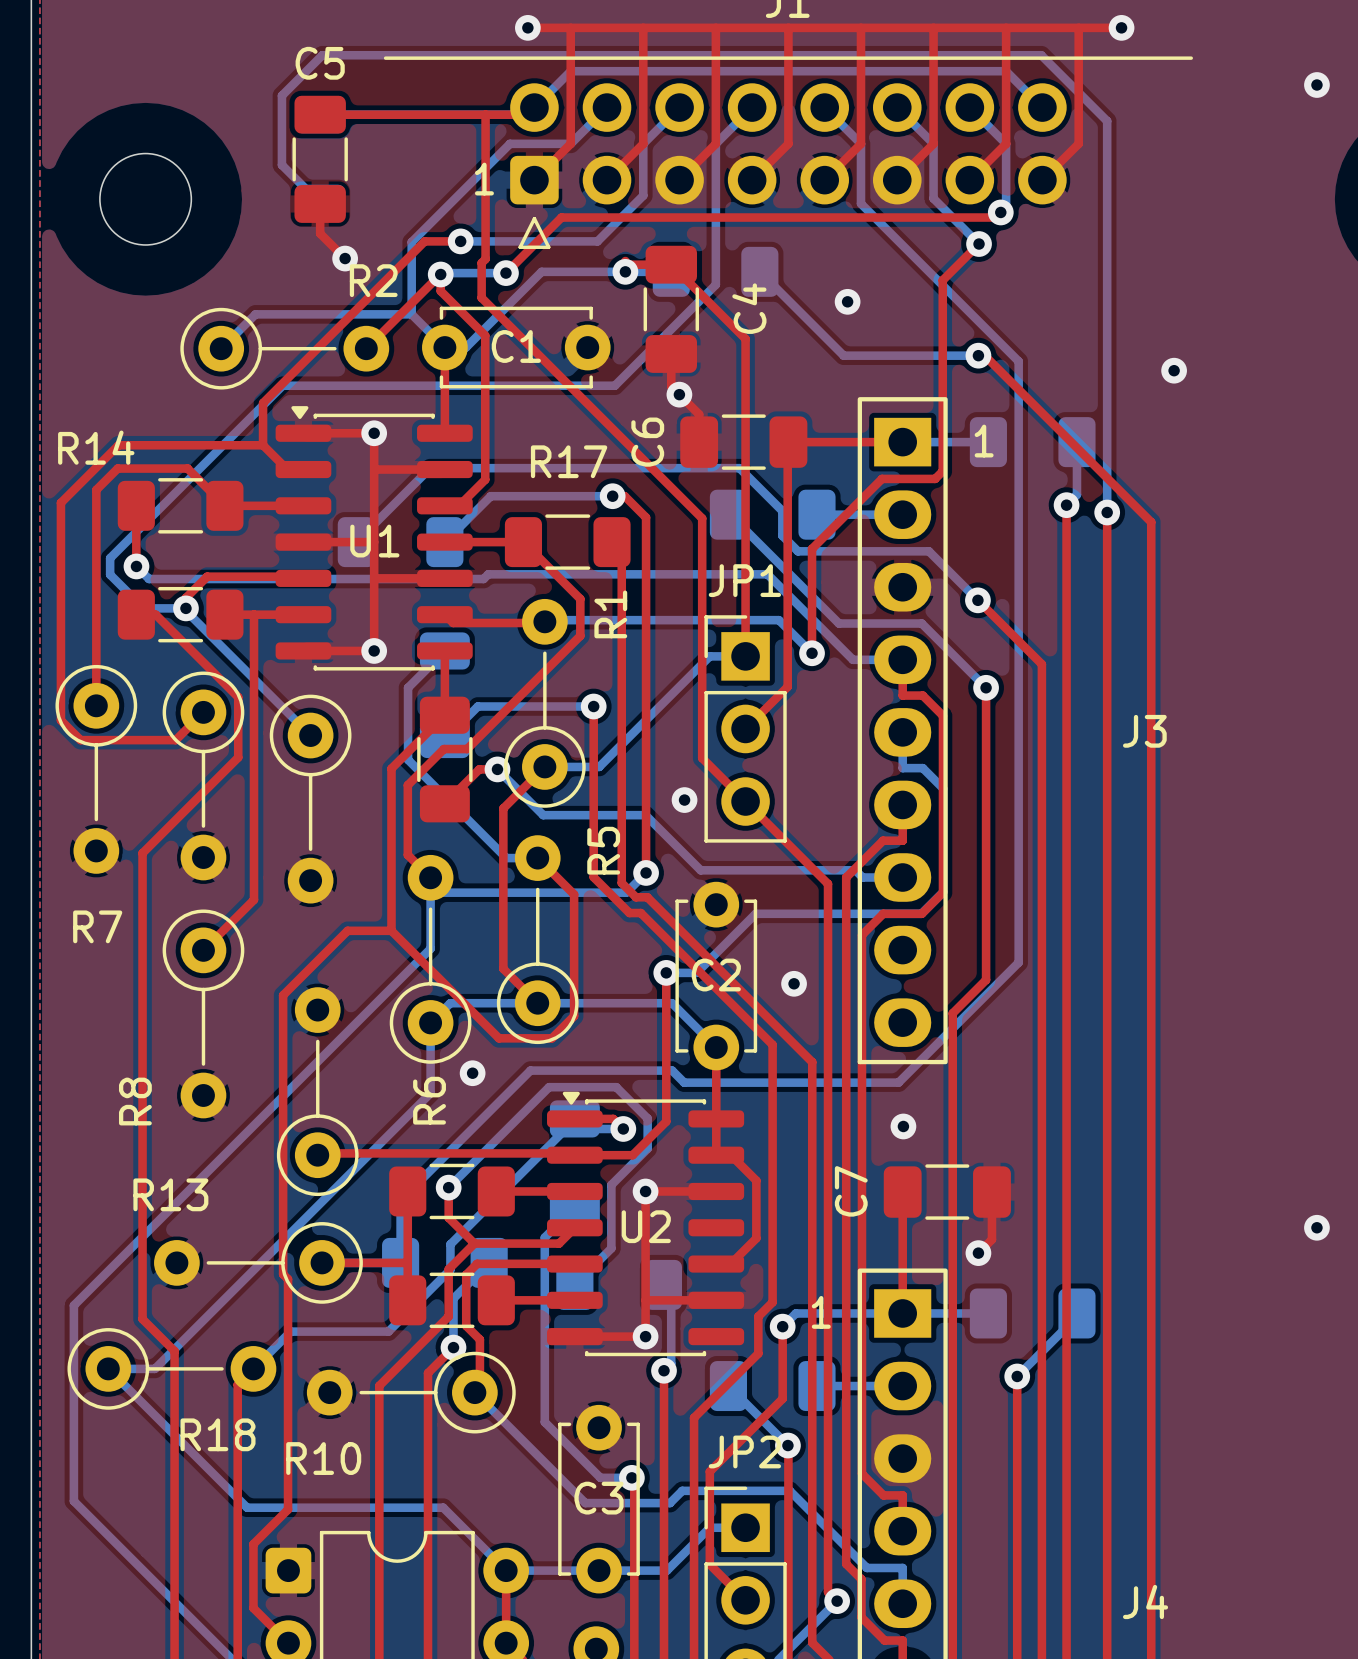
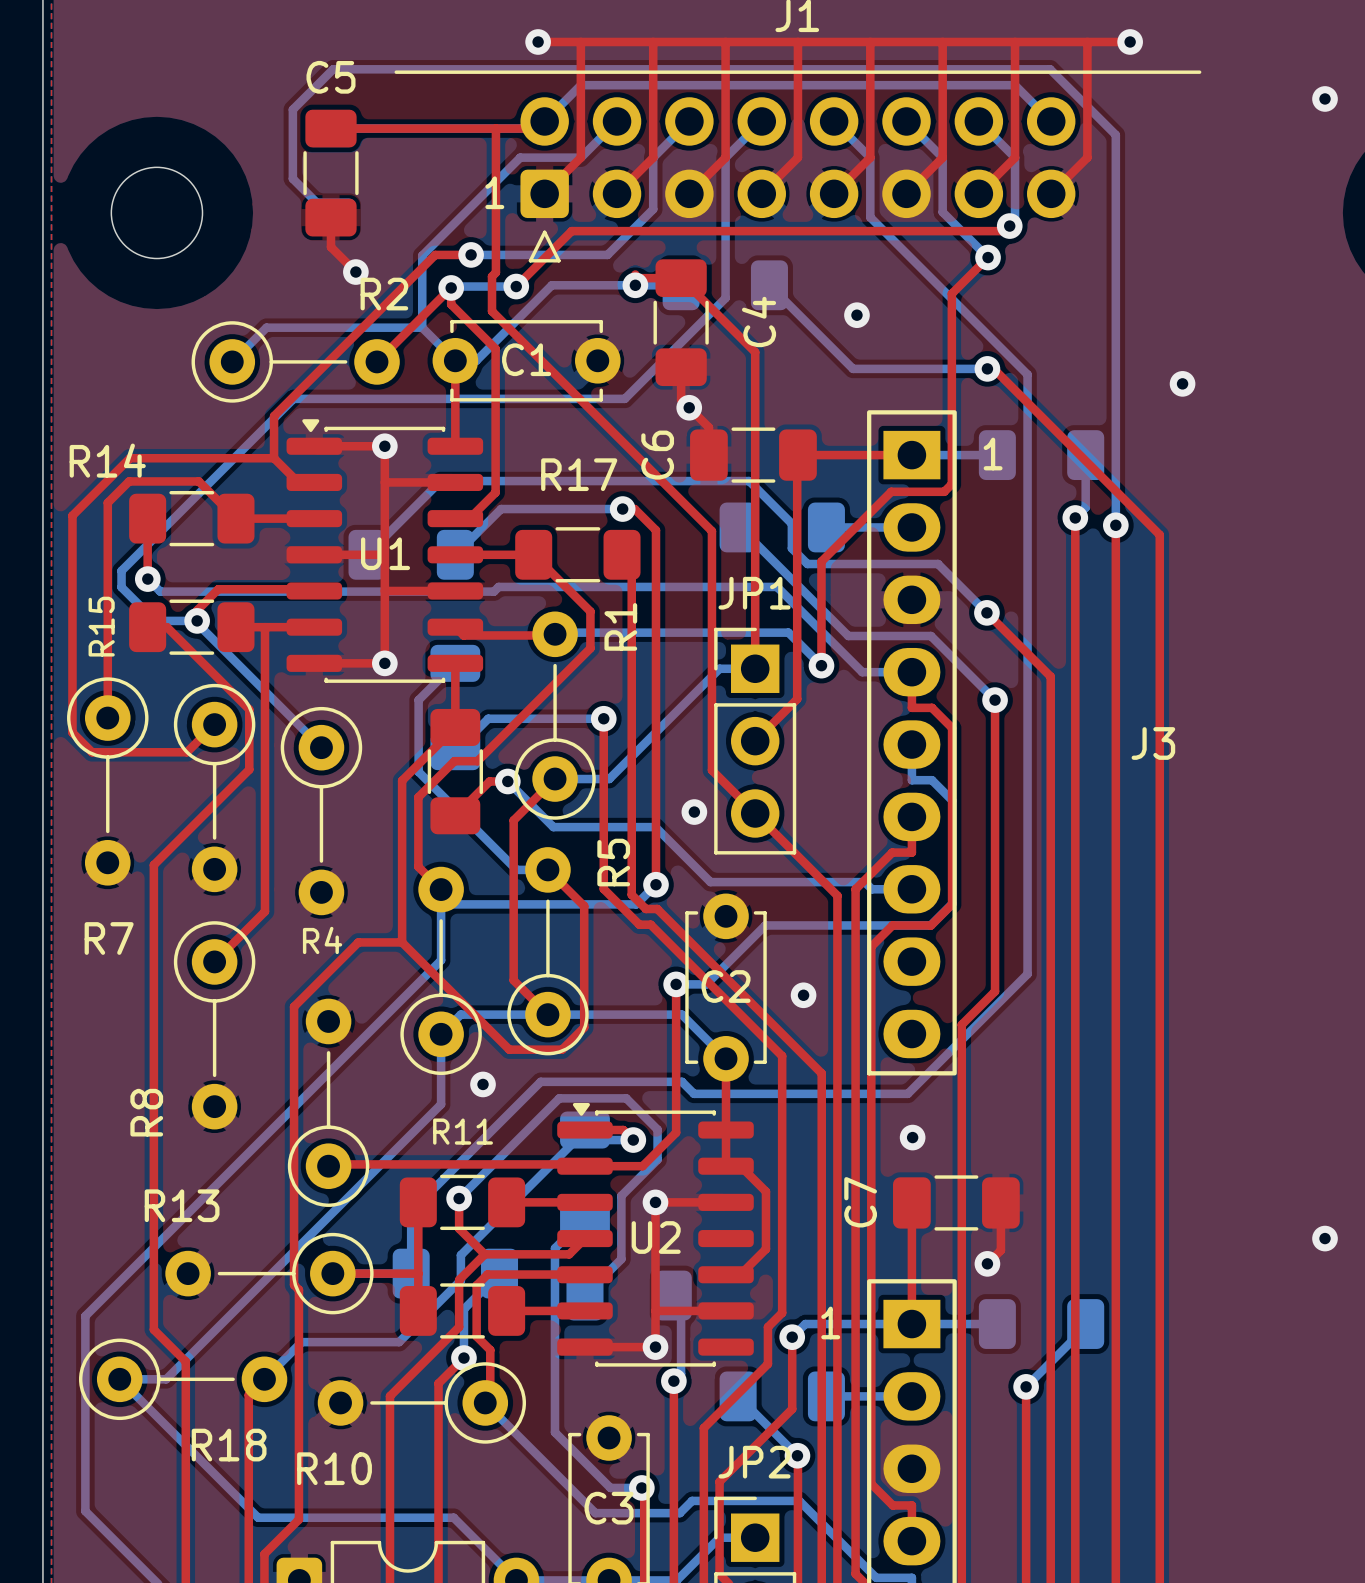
R15 name: none -> R15 (101, 626)
R4 name: none -> R4 (322, 940)
R6 name: R6 (429, 1100) -> none
R11 name: none -> R11 (463, 1131)

